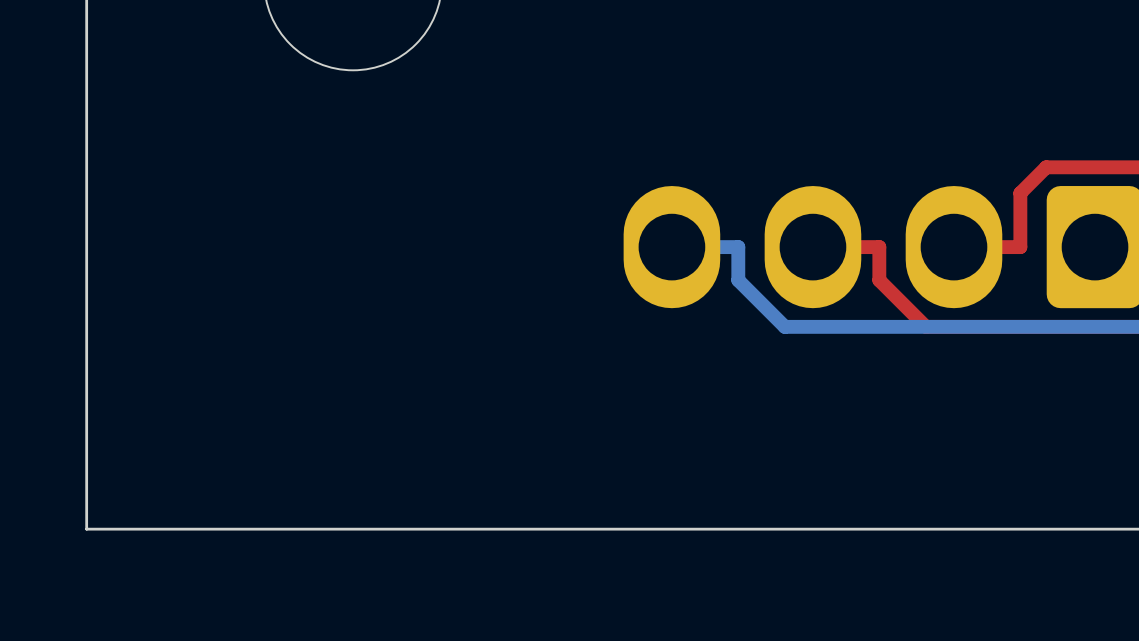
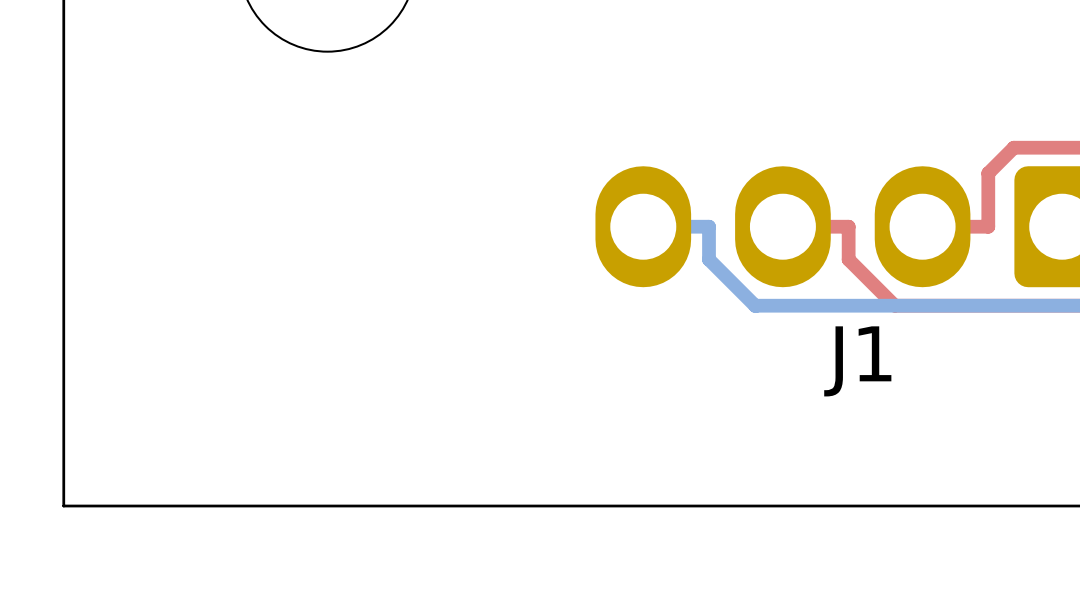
J1 name: none -> J1 (857, 361)

